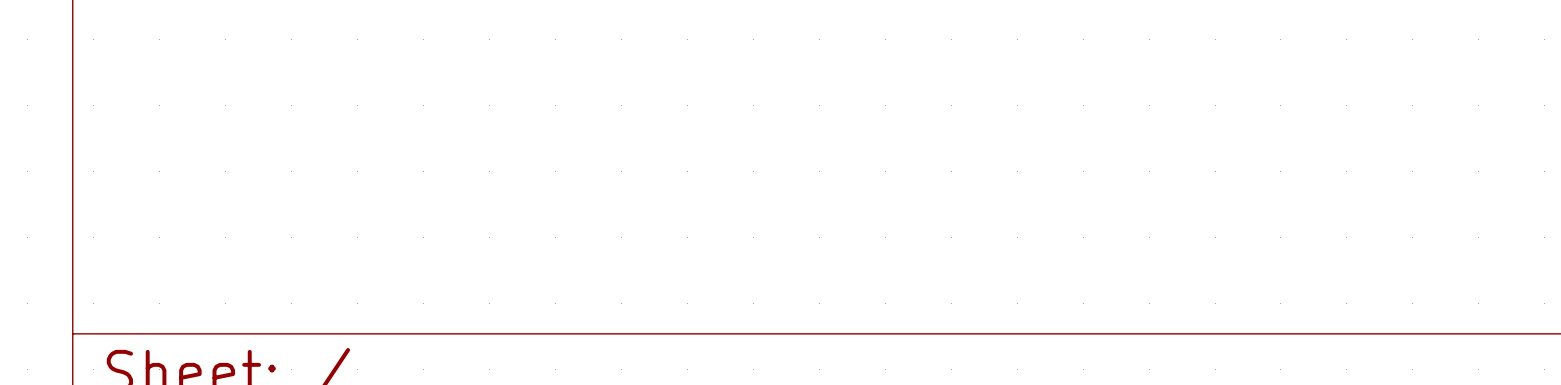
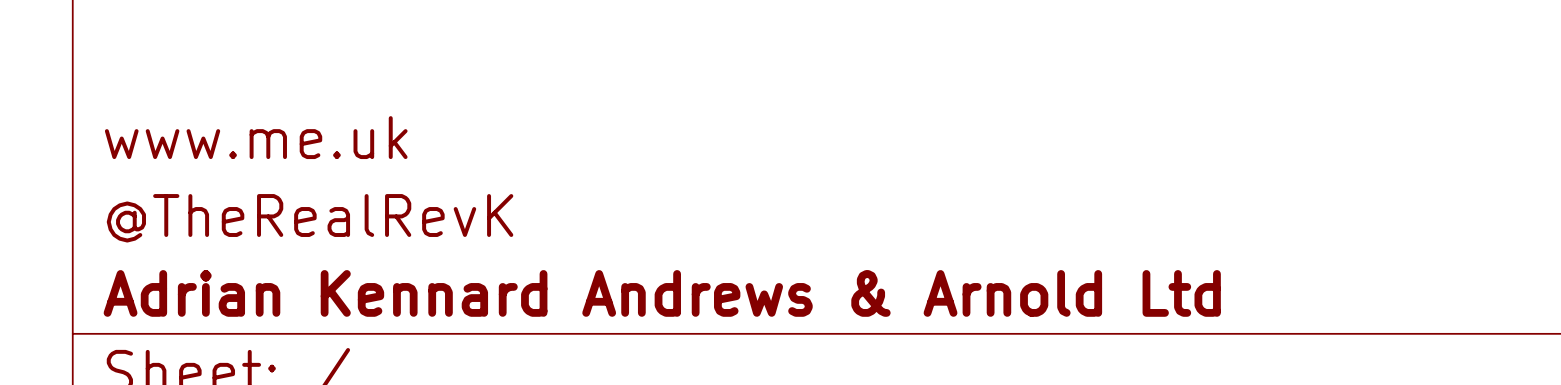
title block: none -> www.me.uk (256, 137)
title block: none -> @TheRealRevK (310, 218)
title block: none -> Adrian Kennard Andrews & Arnold Ltd (662, 293)

